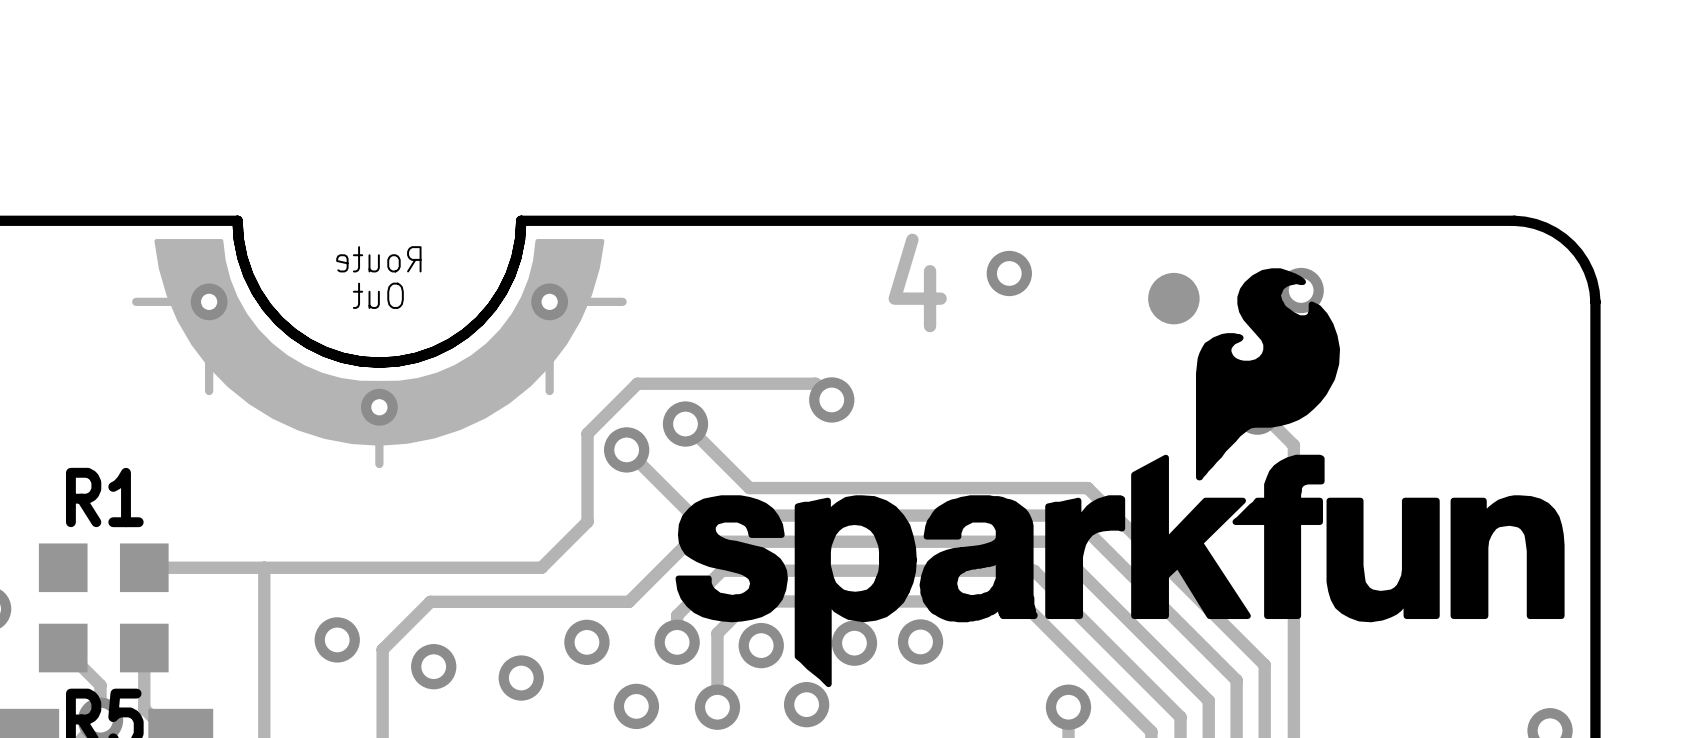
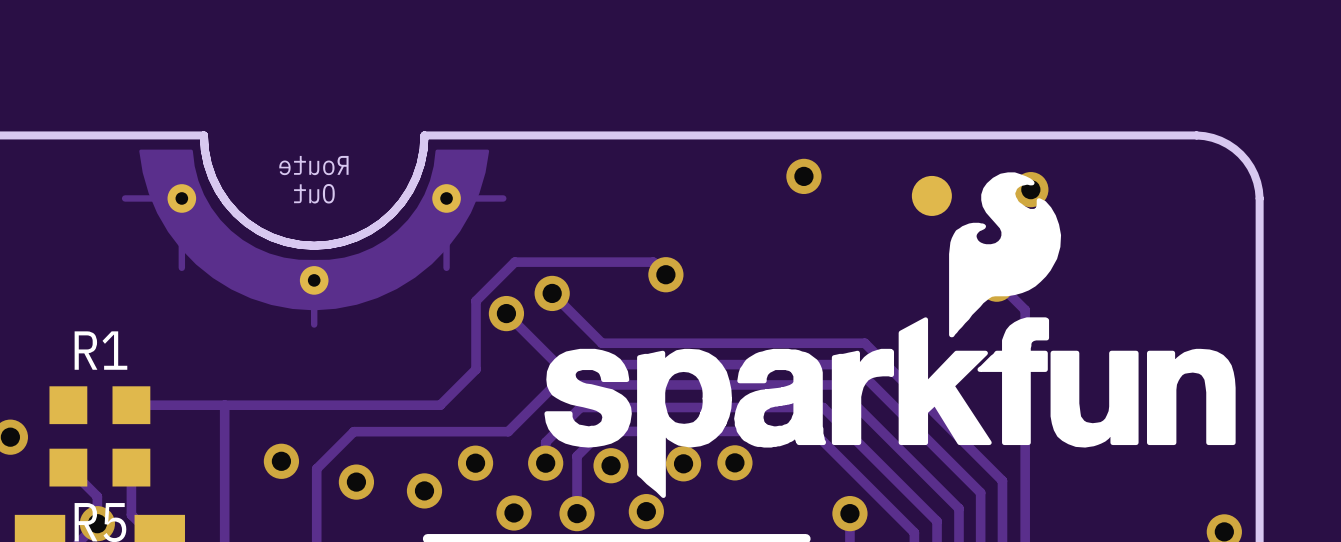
text: 4 (917, 282) -> none

